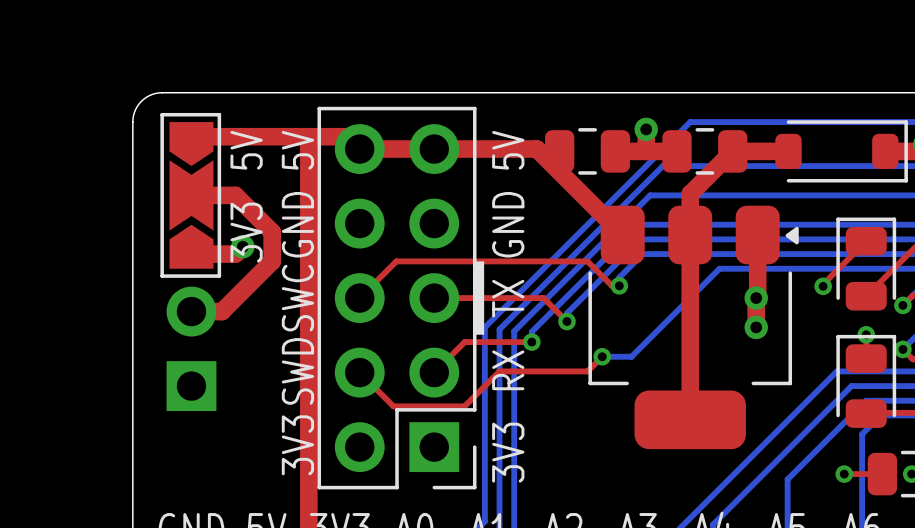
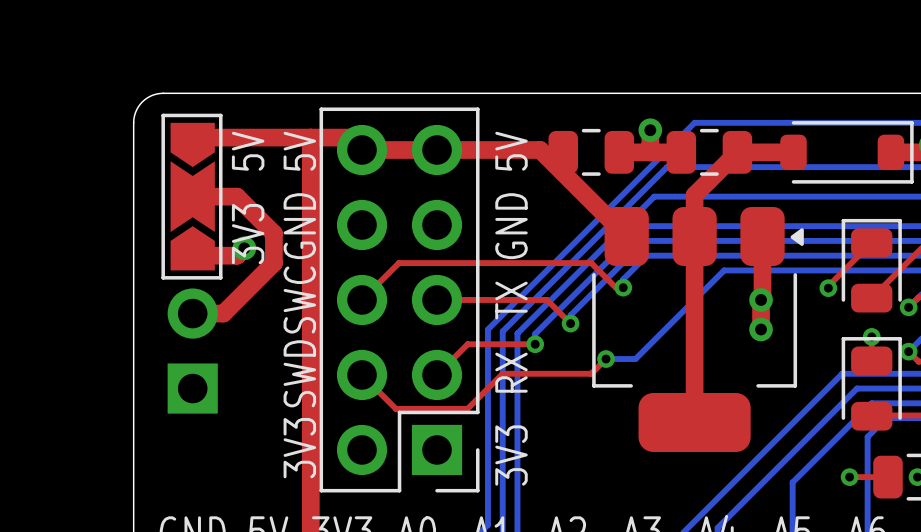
drawing: [473, 261, 485, 335] -> none

